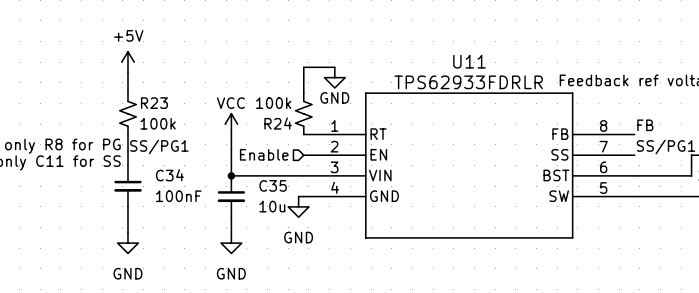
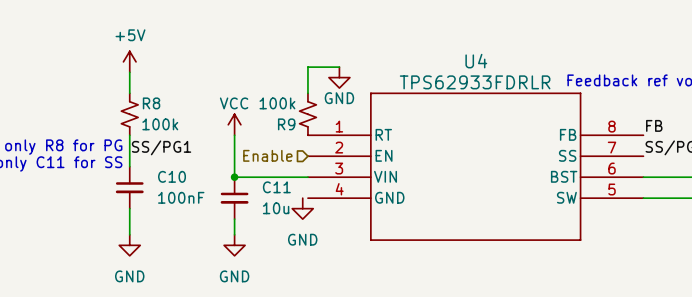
U11 name: U11 (469, 61) -> U4 (476, 61)
R23 name: R23 (154, 103) -> R8 (151, 103)
R24 name: R24 (278, 123) -> R9 (286, 124)
C34 name: C34 (169, 175) -> C10 (172, 176)
C35 name: C35 (273, 185) -> C11 (276, 187)
wire: (298, 196) (303, 196) -> none

